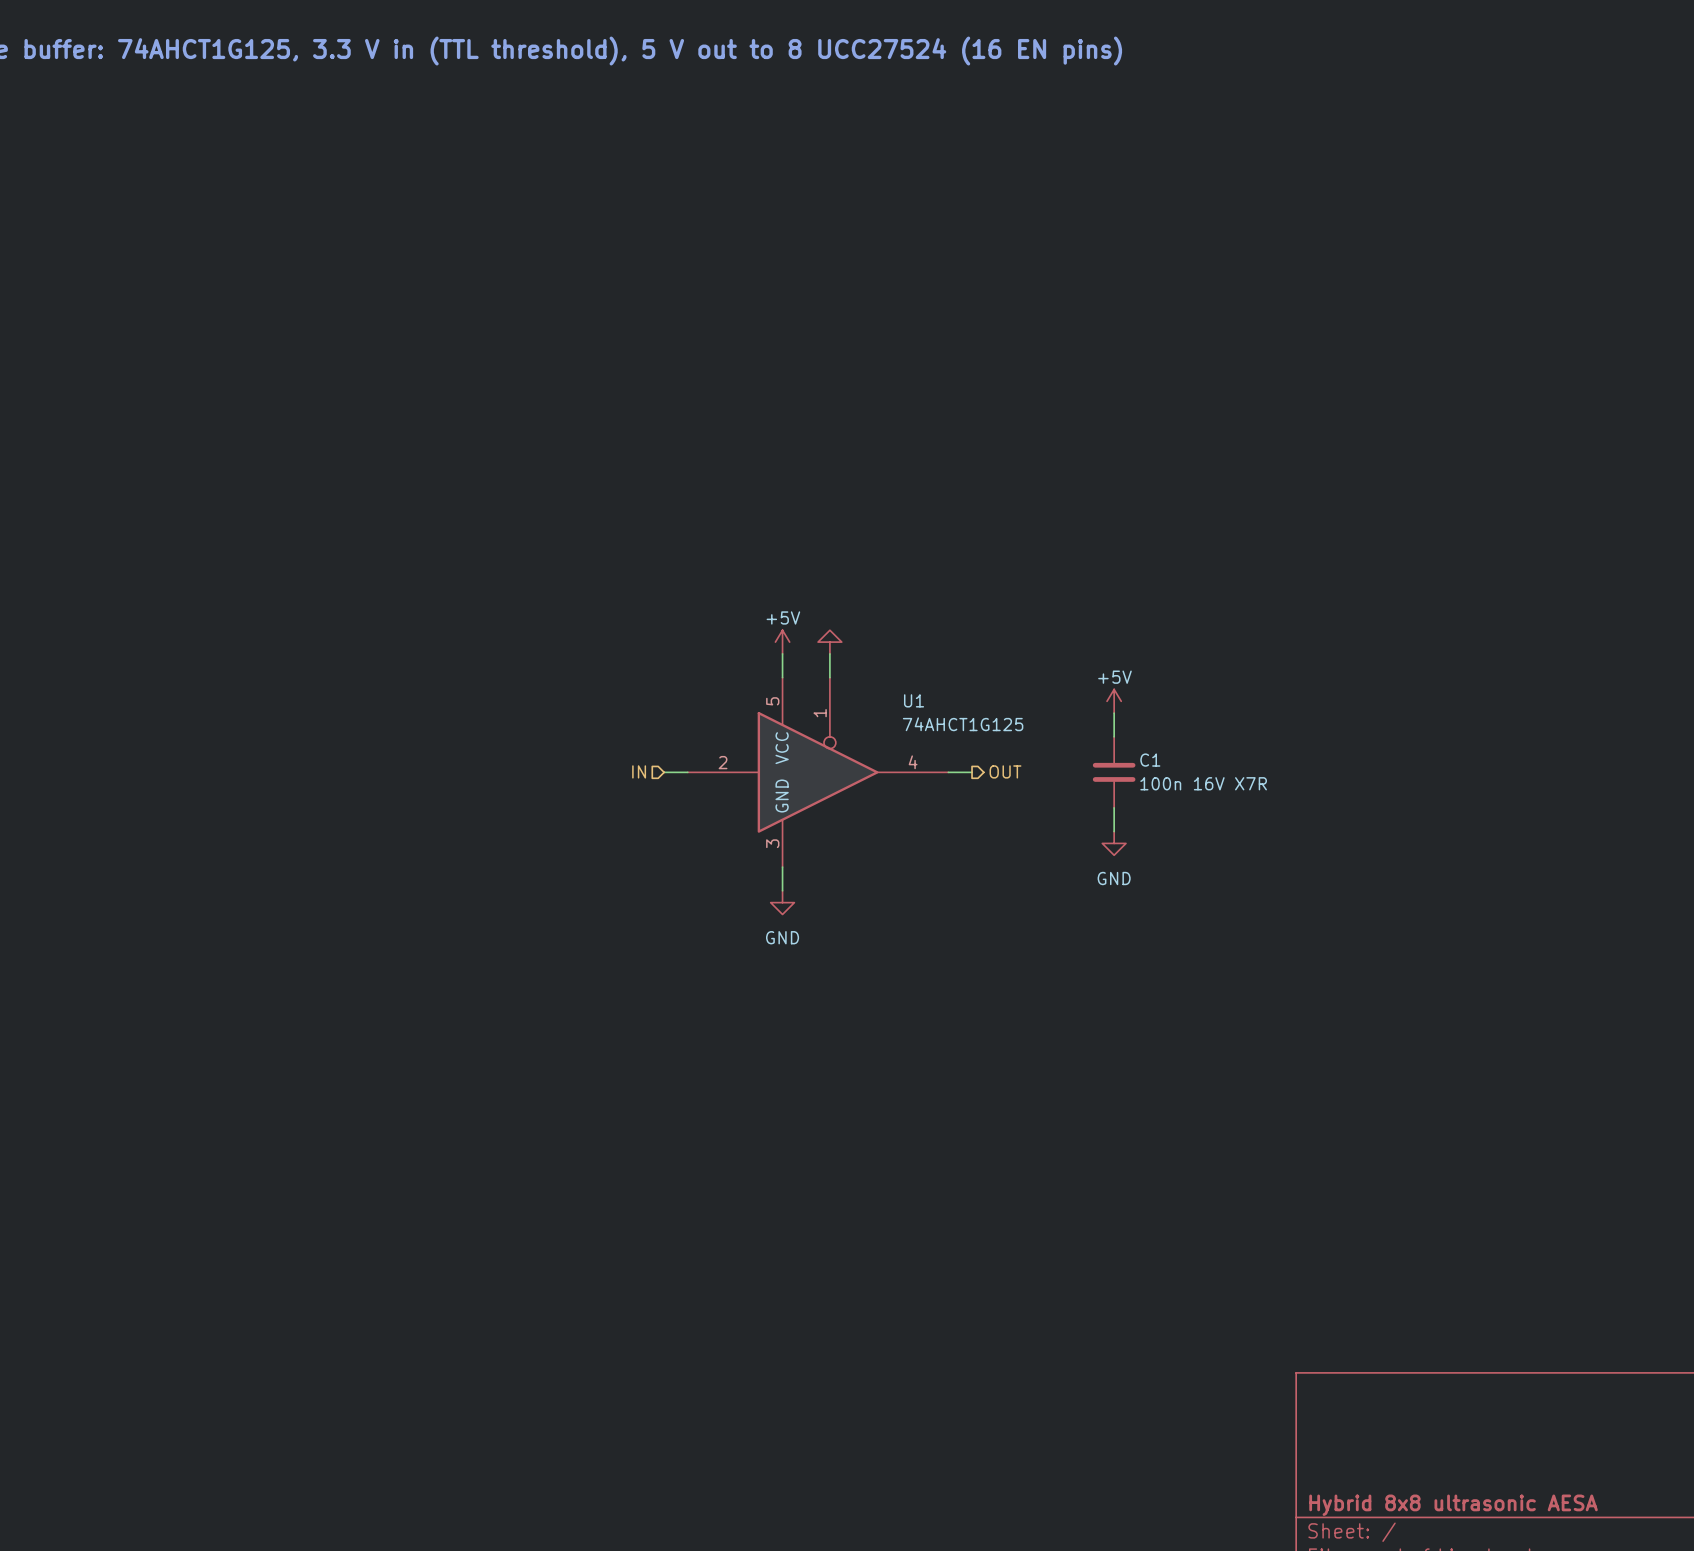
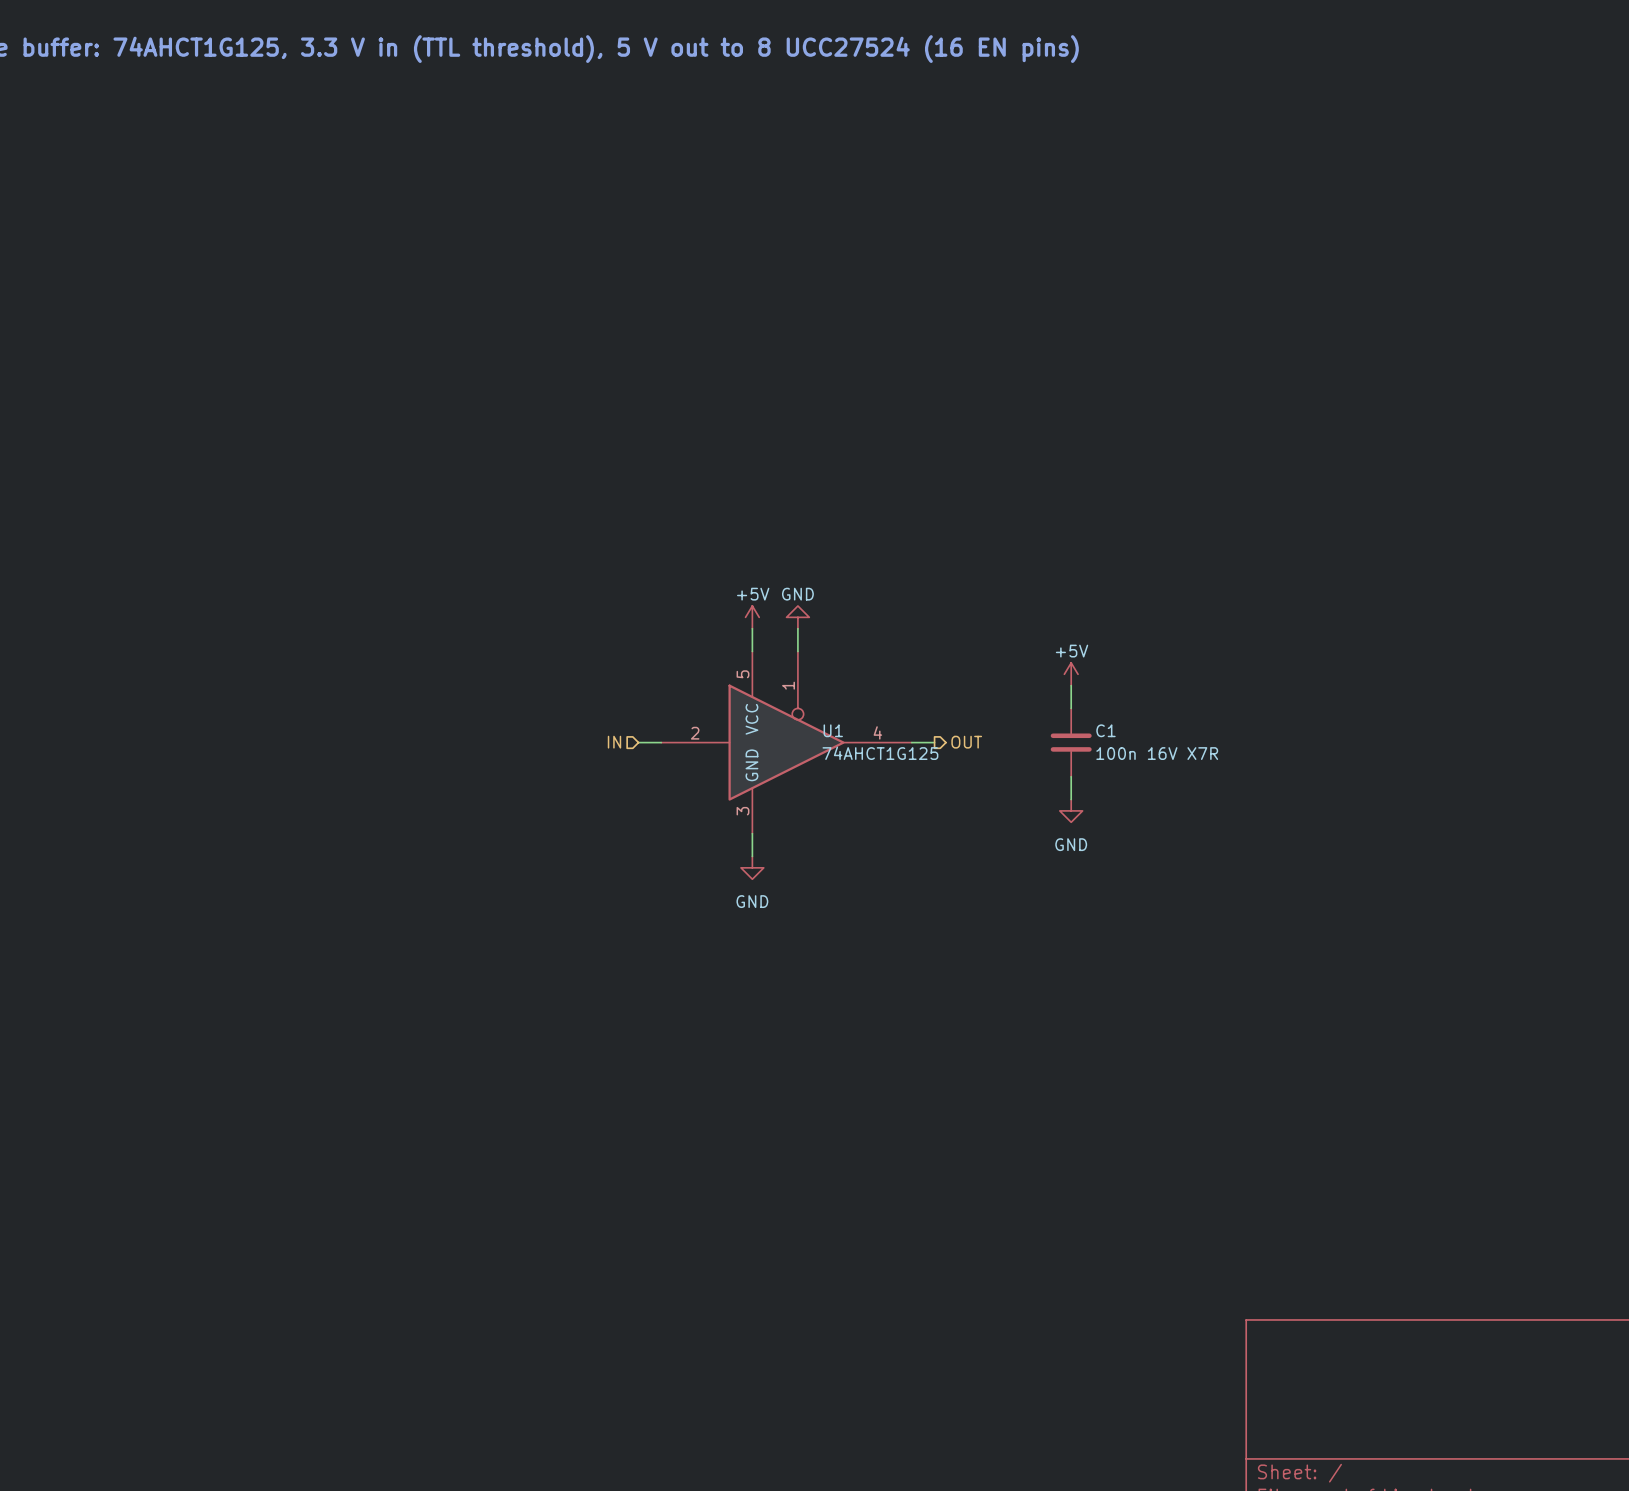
power symbol text: none -> GND (797, 594)
U1 name position: U1 (914, 700) -> U1 (833, 730)
U1 value position: 74AHCT1G125 (963, 724) -> 74AHCT1G125 (880, 753)
title block: Hybrid 8x8 ultrasonic AESA (1453, 1505) -> none

